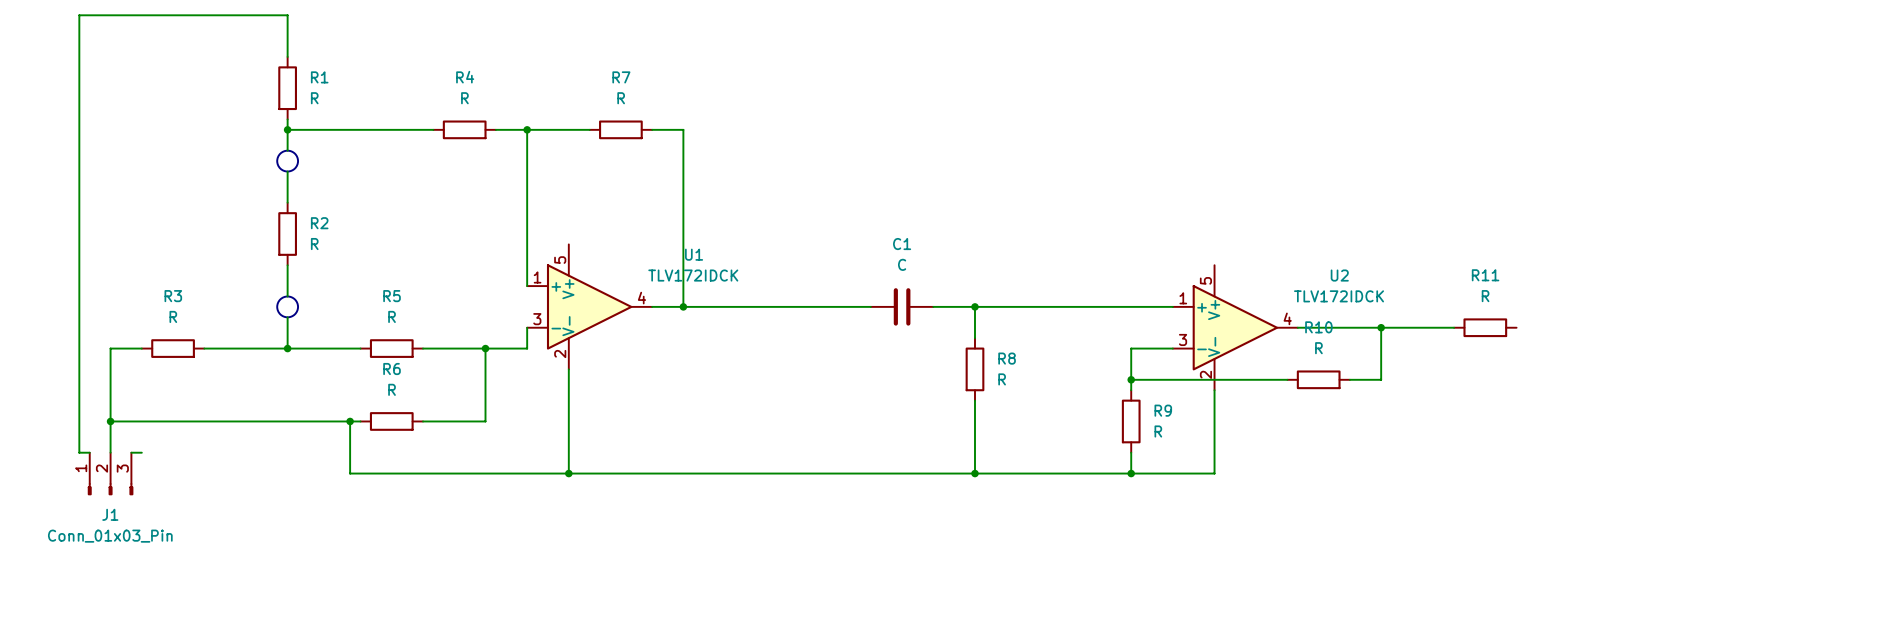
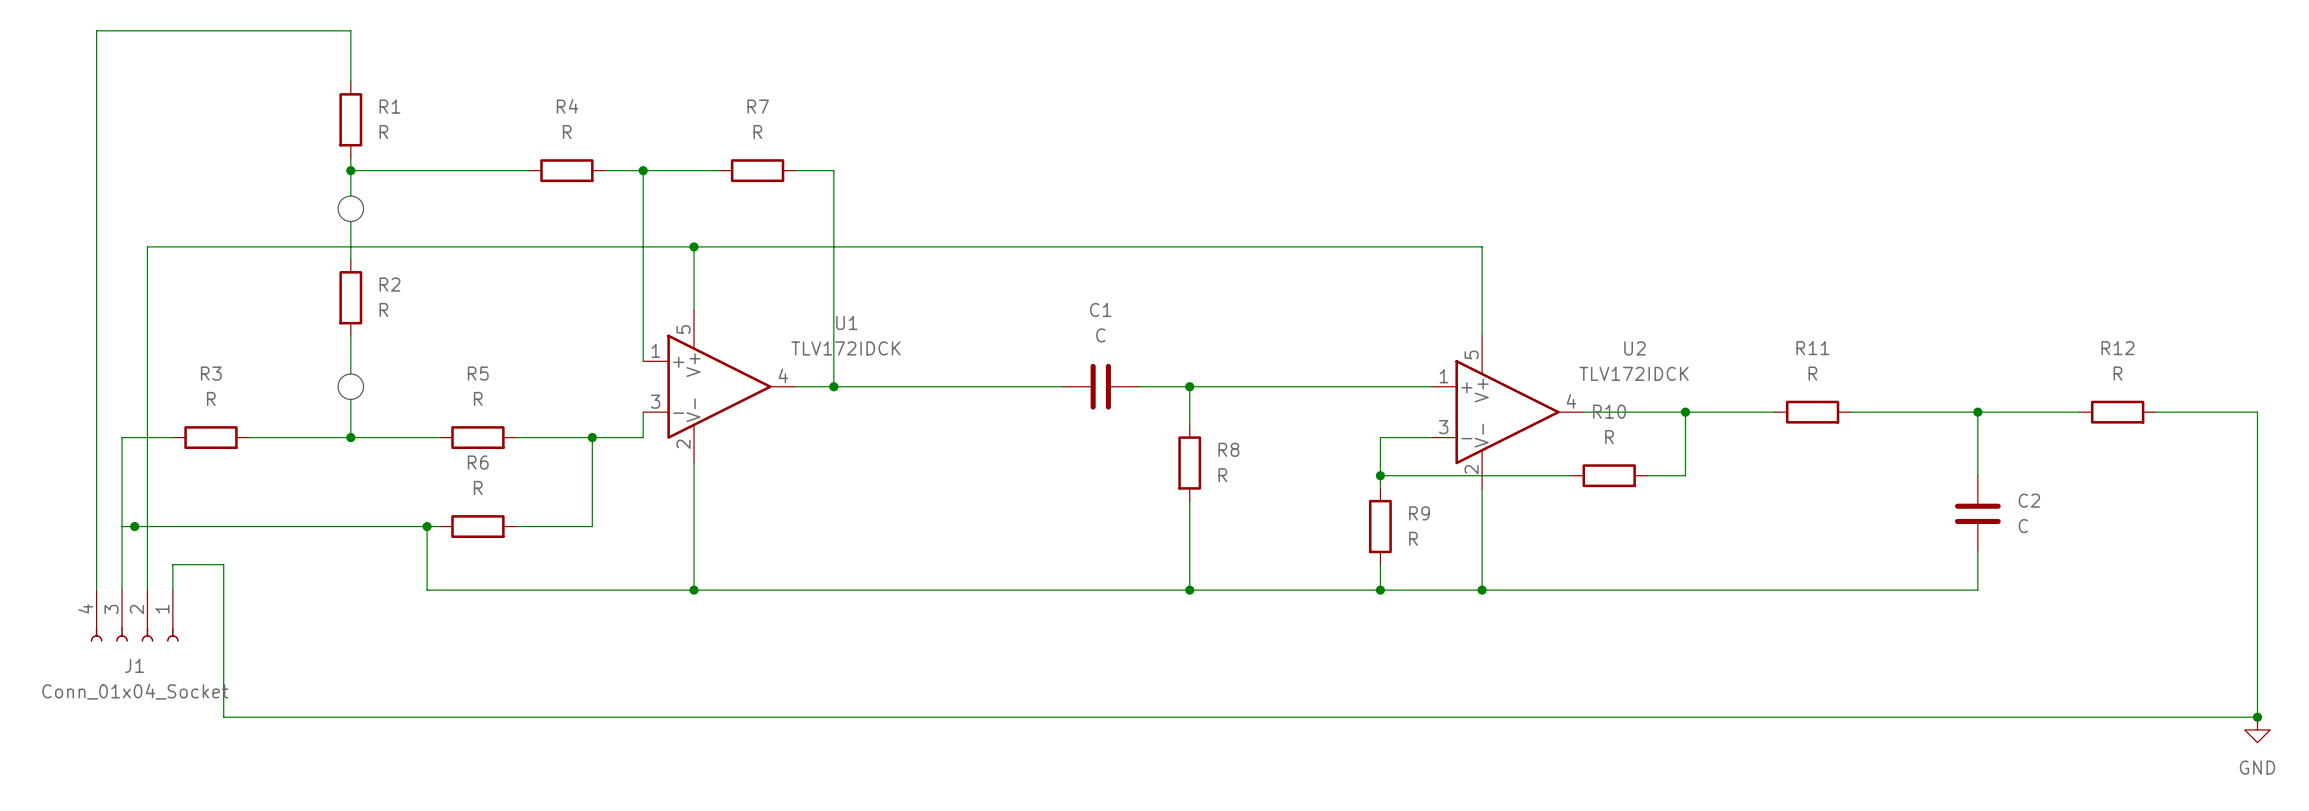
wire: none -> (694, 246) (694, 310)
junction: none -> (694, 246)
wire: none -> (1482, 335) (1482, 246) (147, 246) (147, 590)
wire: none -> (1850, 412) (2079, 412)
wire: none -> (1977, 412) (1977, 475)
junction: none -> (1977, 412)
R12: none -> R (2117, 412)
wire: none -> (2155, 412) (2257, 412) (2257, 717) (223, 717) (223, 564) (172, 564) (172, 590)
wire: (110, 348) (110, 452) -> (134, 437) (122, 437) (122, 590)
C2: none -> C (1977, 513)
wire: none -> (1977, 551) (1977, 590) (1482, 590)
wire: (79, 452) (89, 452) -> (96, 564) (96, 590)
J1 symbol: [88, 452, 134, 495] -> [90, 590, 179, 642]
wire: (131, 452) (141, 452) -> (122, 526) (134, 526)
junction: none -> (1482, 590)
J1 value: Conn_01x03_Pin (110, 536) -> Conn_01x04_Socket (135, 691)
junction: none -> (2257, 717)
power symbol: none -> GND (2257, 729)

